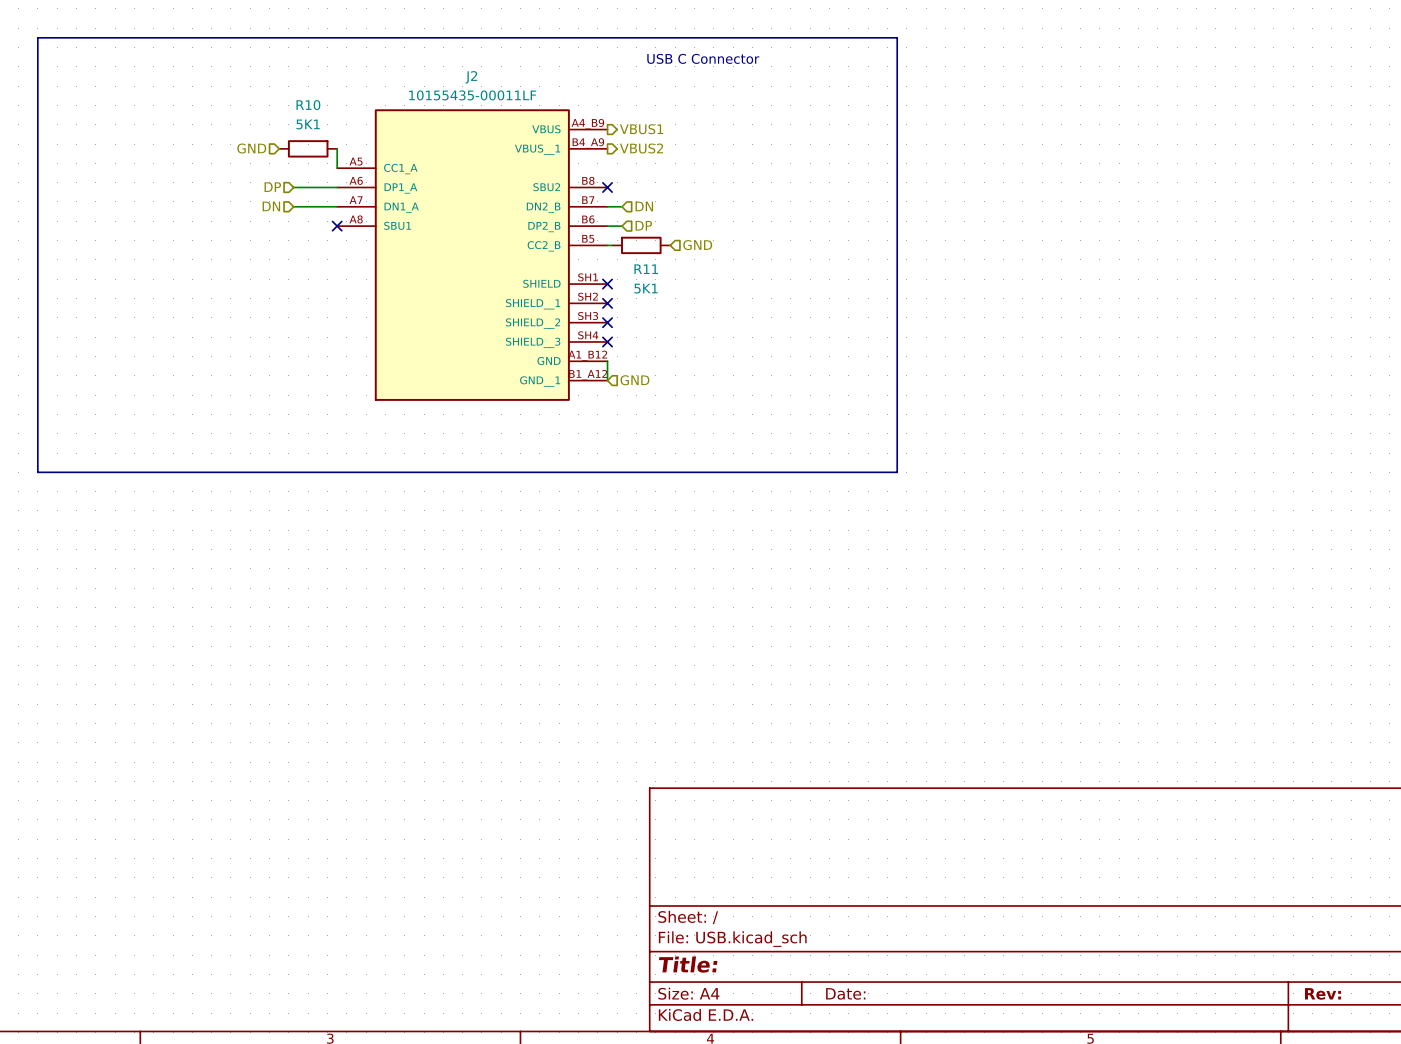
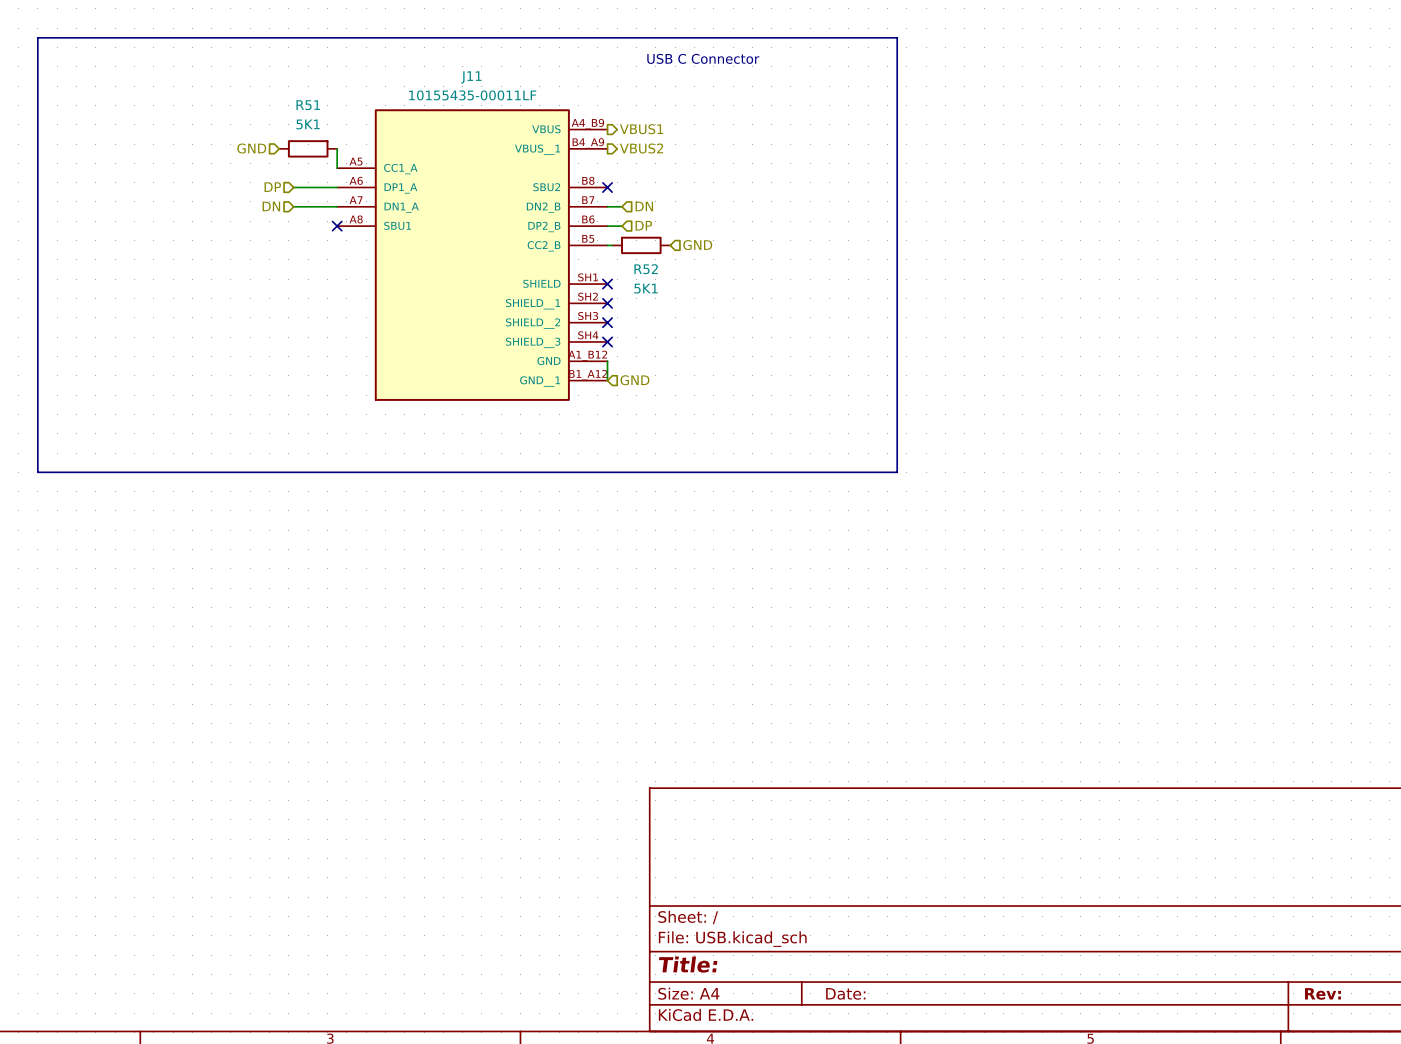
J2 name: J2 (471, 77) -> J11 (471, 77)
R10 name: R10 (308, 105) -> R51 (308, 105)
R11 name: R11 (646, 269) -> R52 (646, 269)

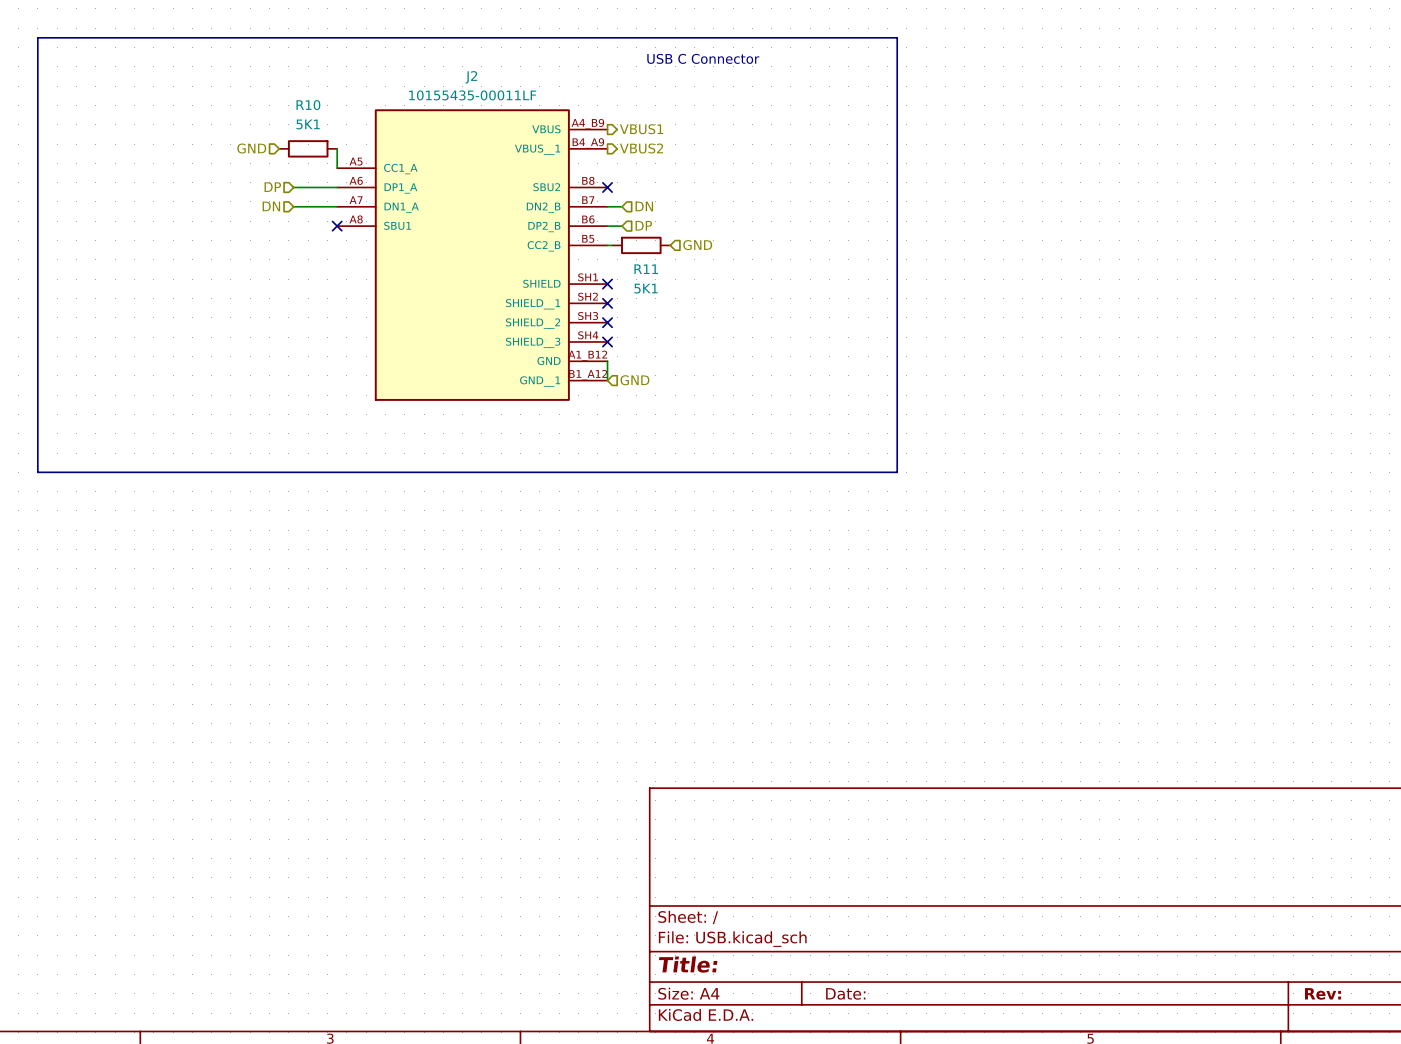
J11 name: J11 (471, 77) -> J2 (471, 77)
R51 name: R51 (308, 105) -> R10 (308, 105)
R52 name: R52 (646, 269) -> R11 (646, 269)

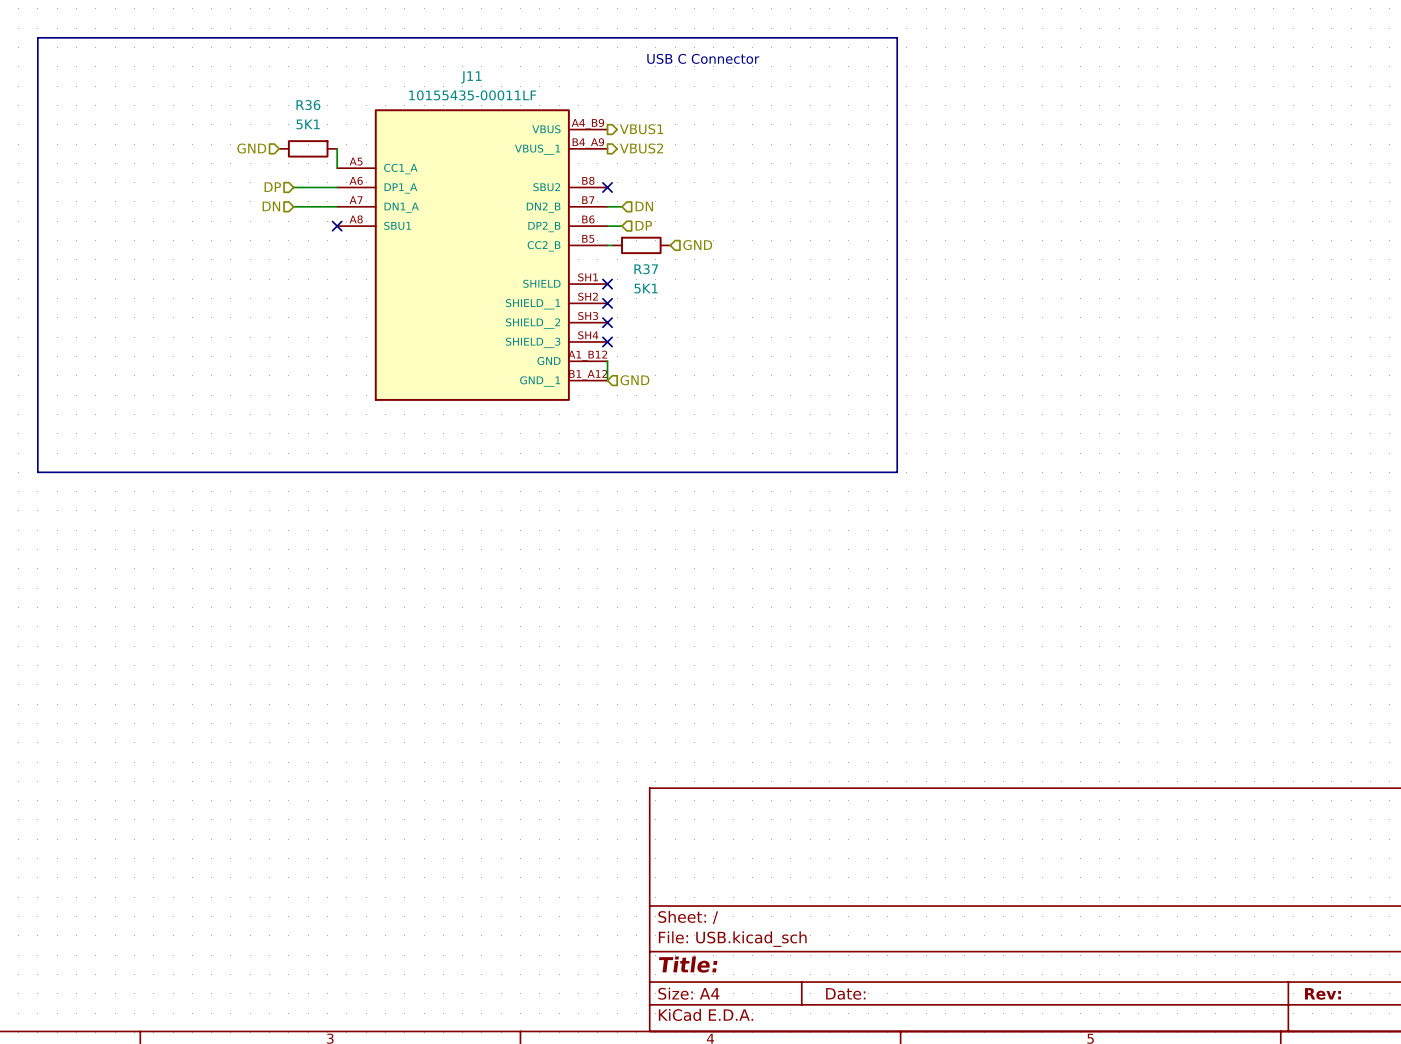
J2 name: J2 (471, 77) -> J11 (471, 77)
R10 name: R10 (308, 105) -> R36 (308, 105)
R11 name: R11 (646, 269) -> R37 (646, 269)

